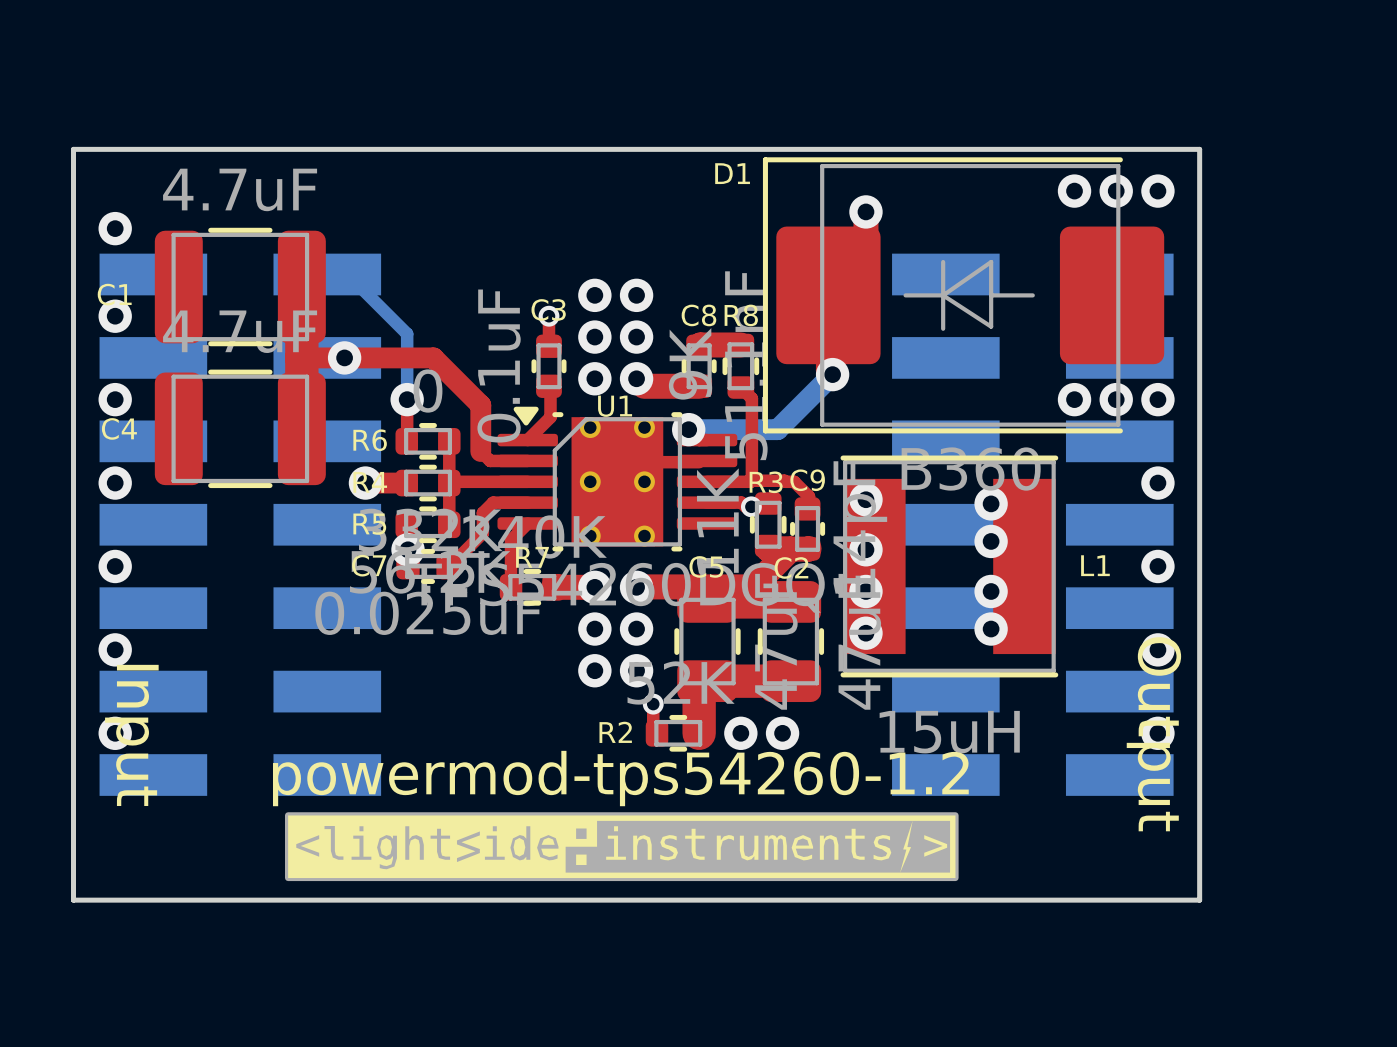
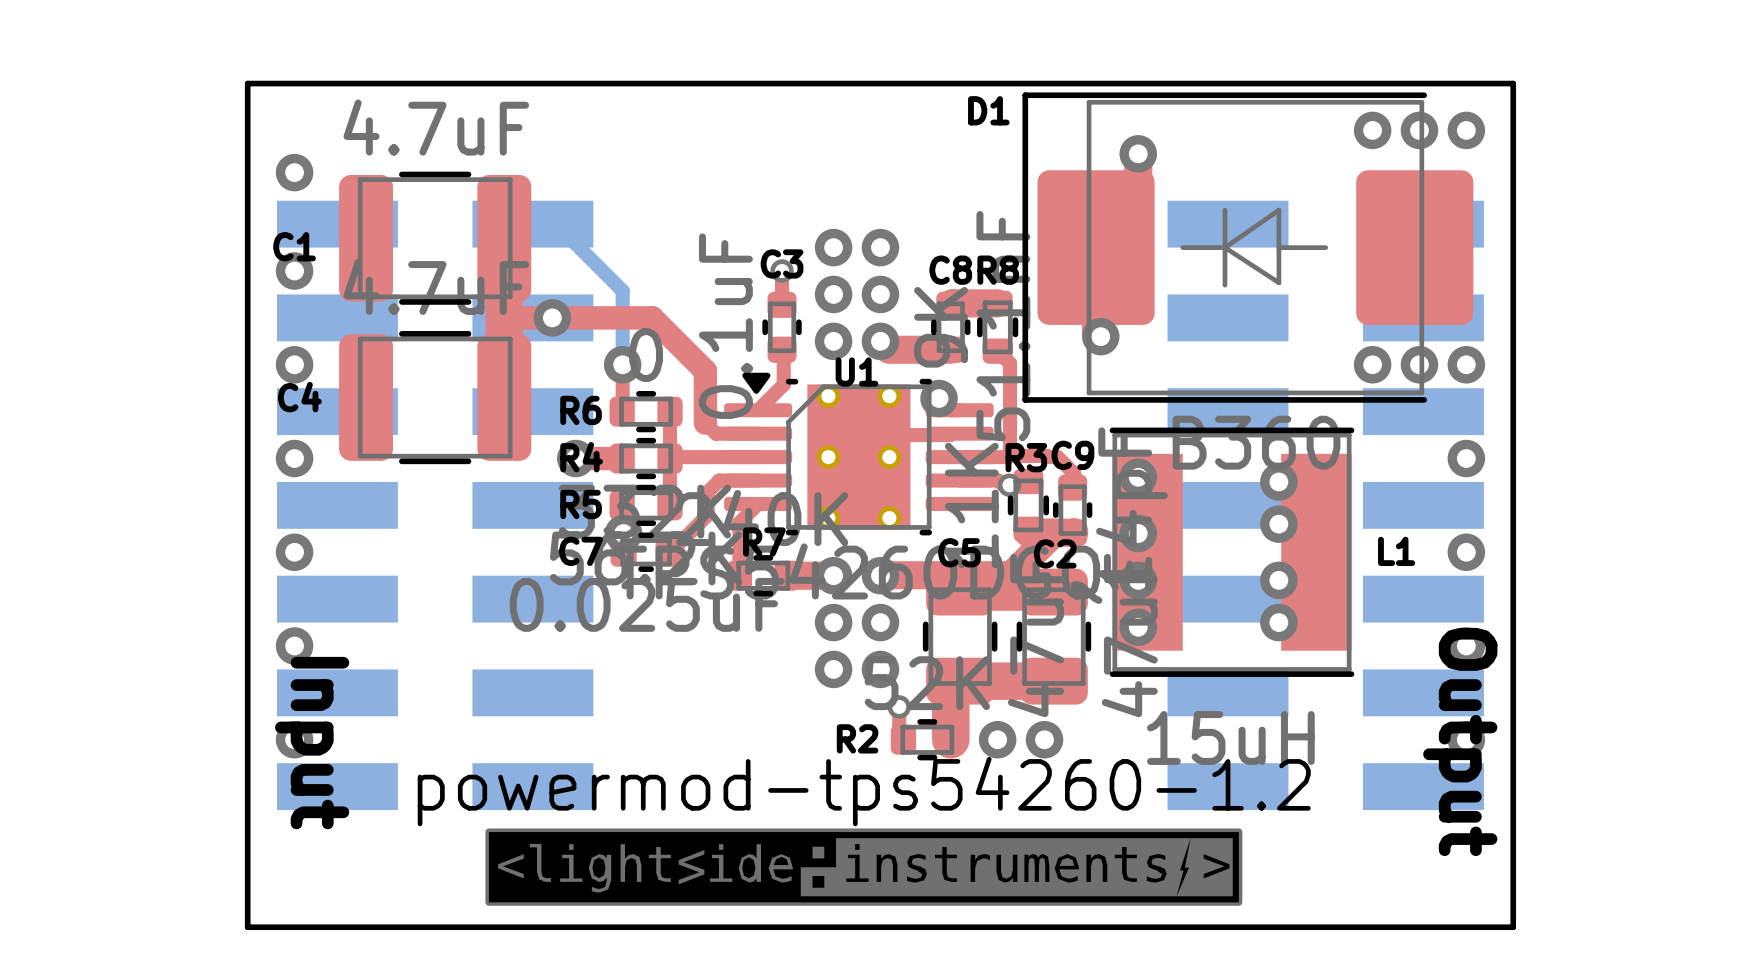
bottom track: (832, 374) (777, 429) (688, 429) -> none

